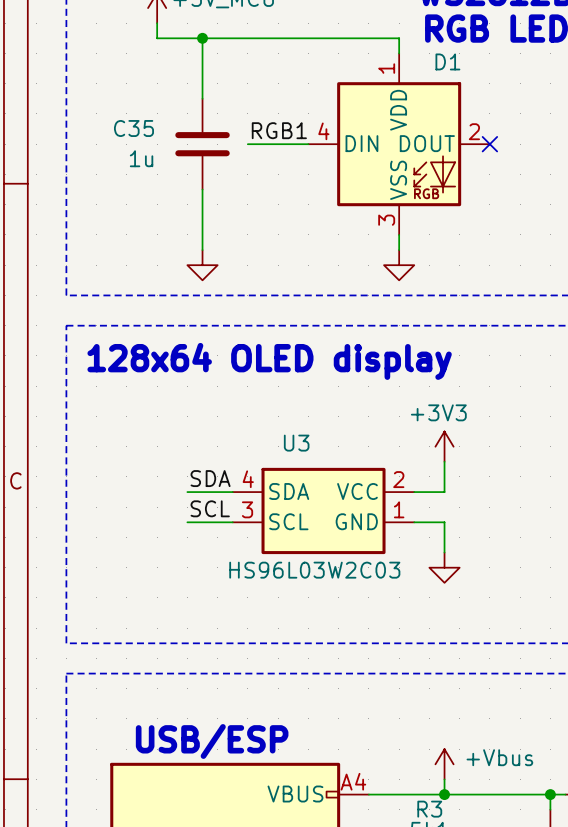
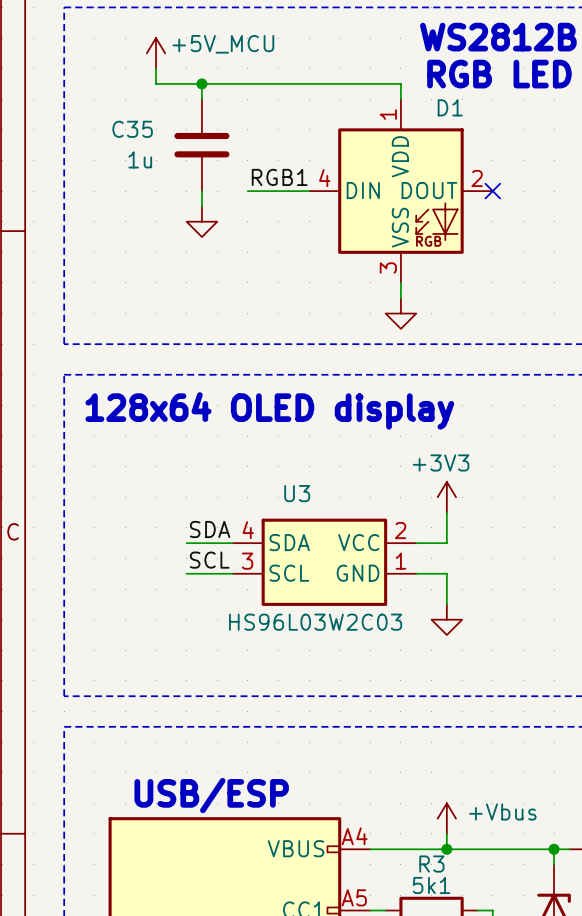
C35 position: (202, 144) -> (201, 145)
wire: (202, 189) (202, 250) -> none
power symbol position: (202, 265) -> (201, 221)

